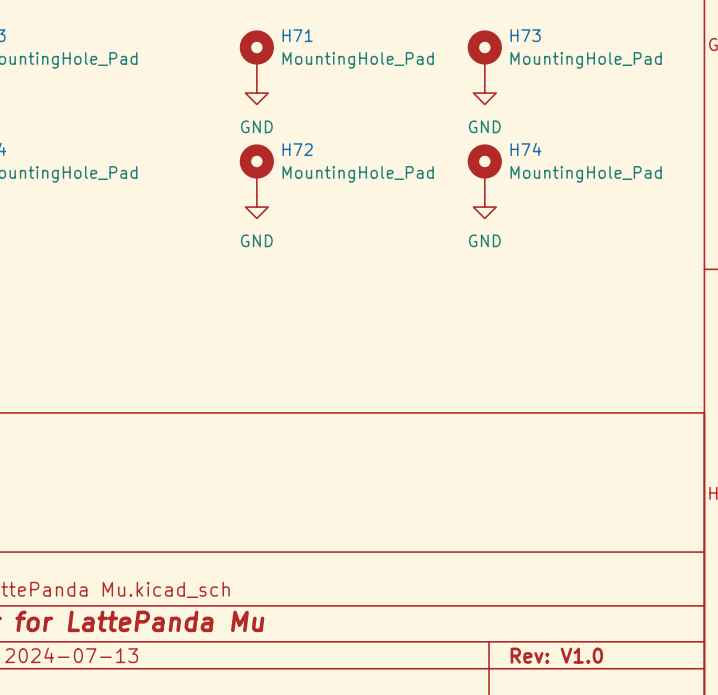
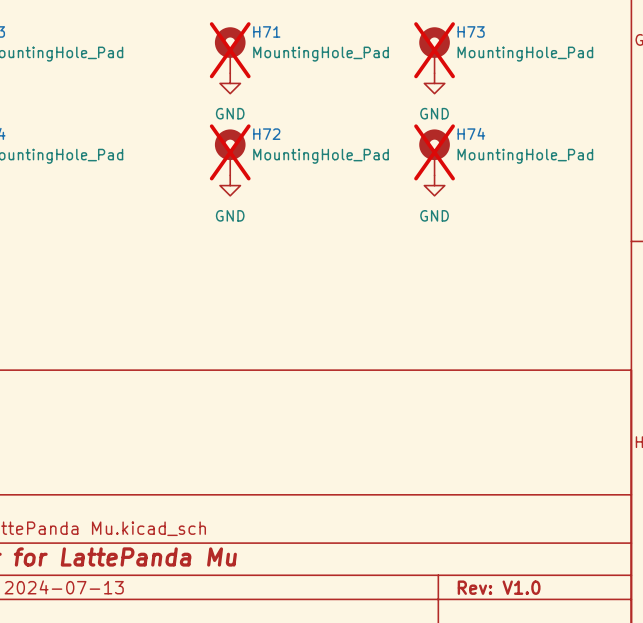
H71 do-not-place cross: none -> (230, 50)
H73 do-not-place cross: none -> (434, 50)
H72 do-not-place cross: none -> (230, 152)
H74 do-not-place cross: none -> (434, 152)

